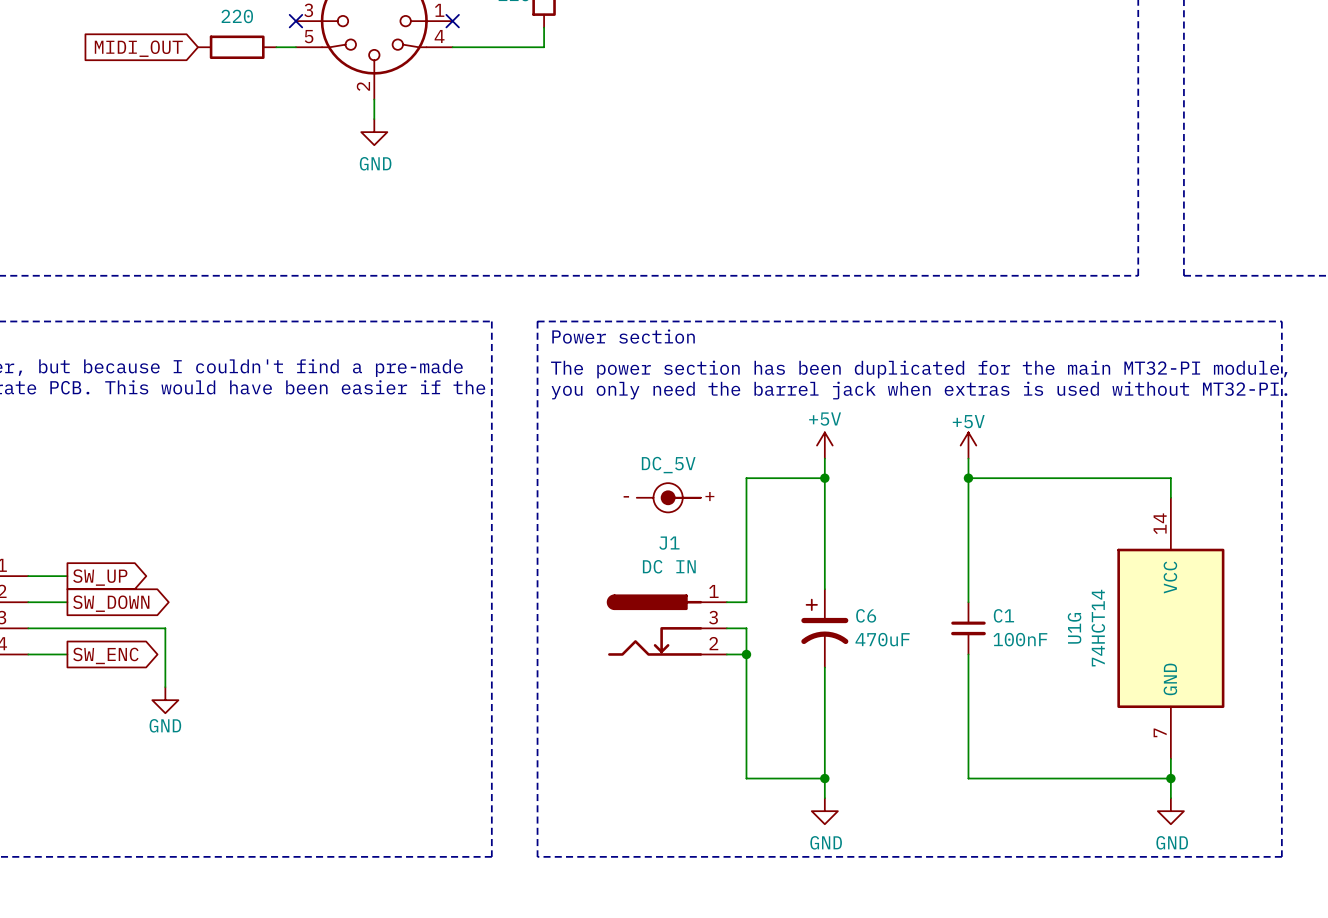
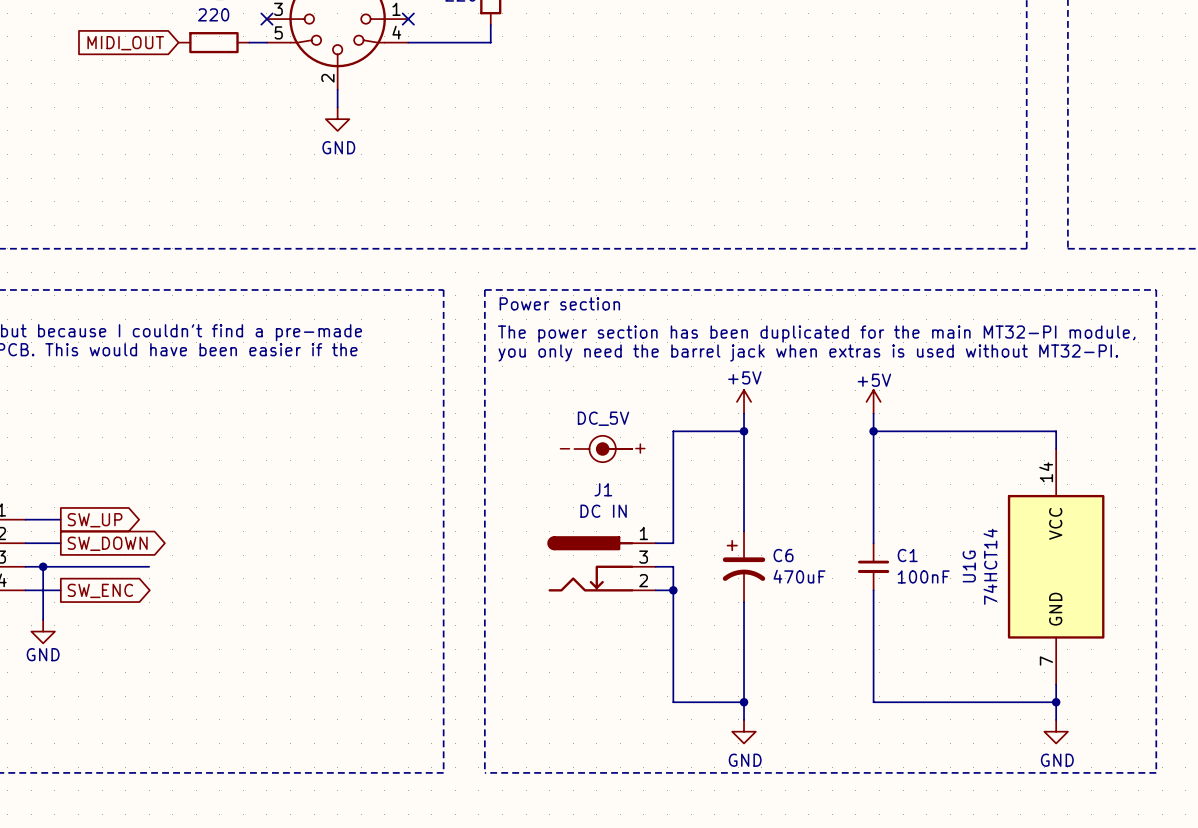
junction: none -> (43, 566)
wire: (165, 628) (165, 687) -> (43, 566) (43, 619)
power symbol position: GND (165, 700) -> GND (43, 631)

